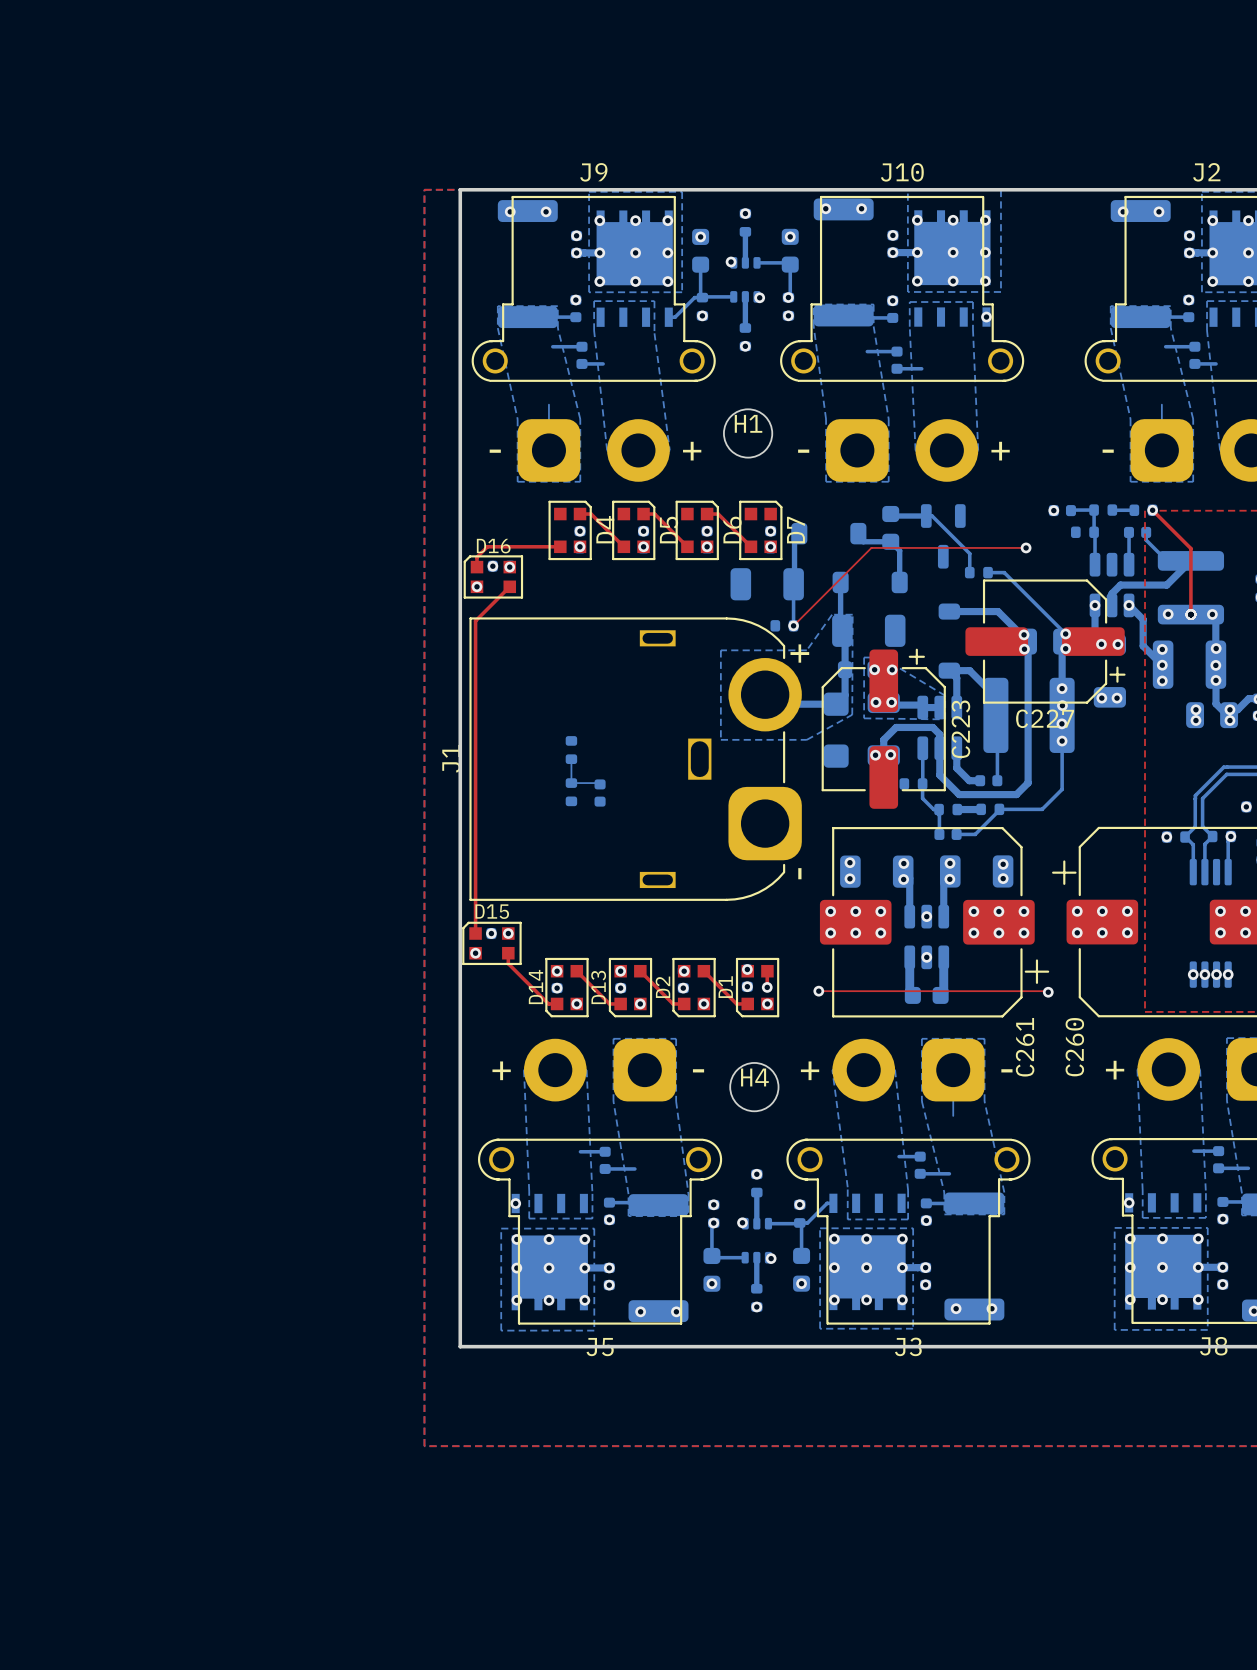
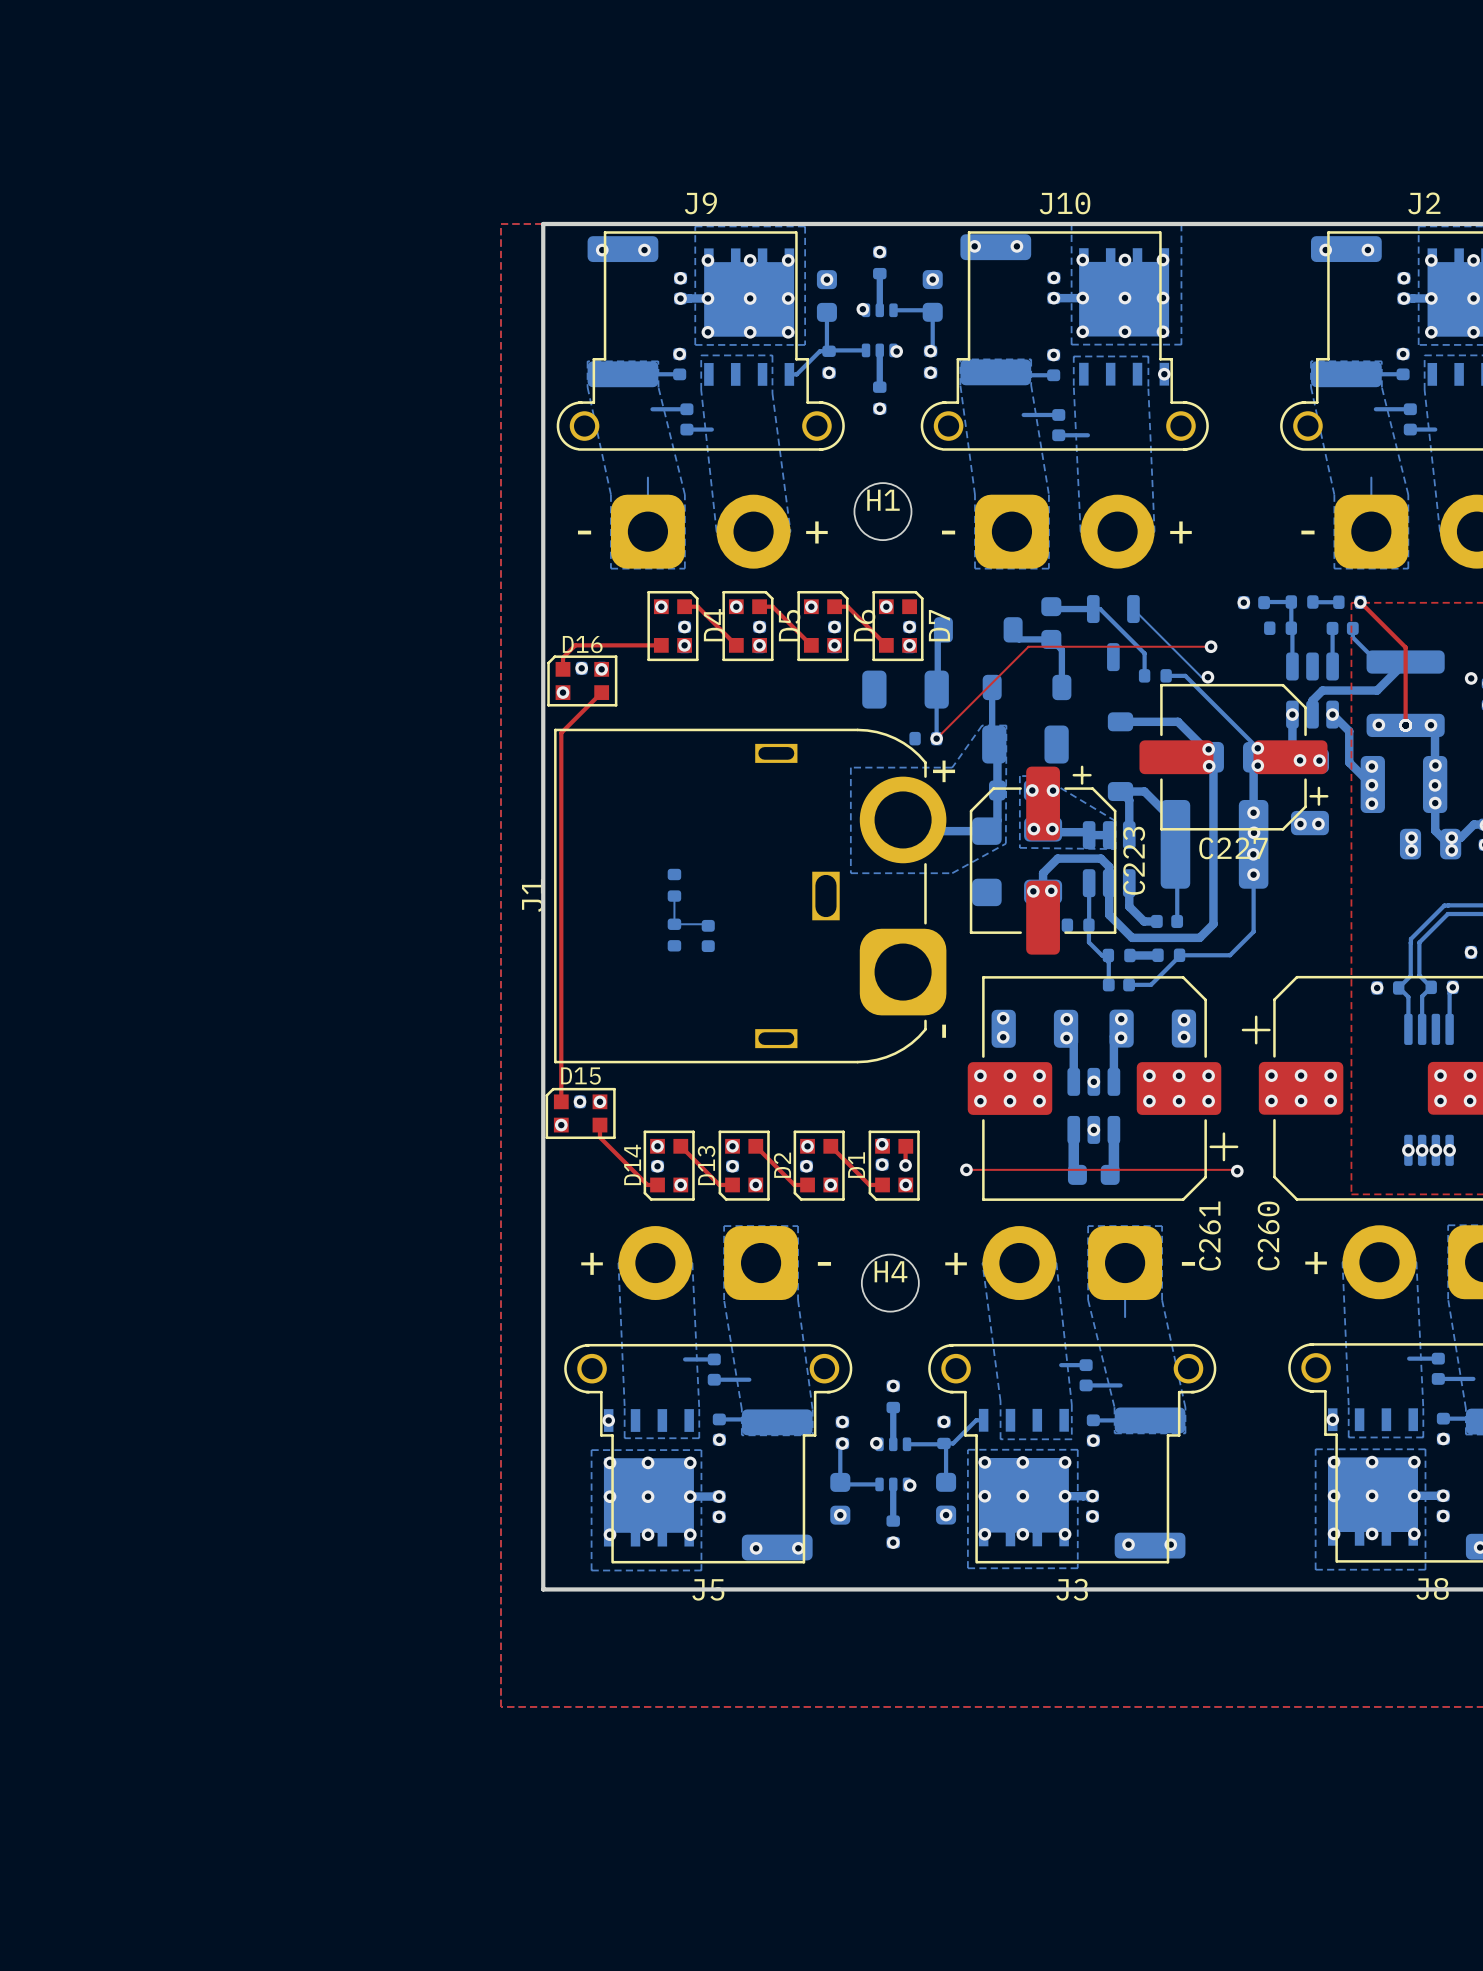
via: none -> (661, 606)
via: none -> (736, 606)
via: none -> (811, 606)
via: none -> (886, 606)
bottom track: none -> (1133, 609) (1201, 677) (1207, 677)
via: none -> (1207, 677)
via: none -> (1471, 678)

